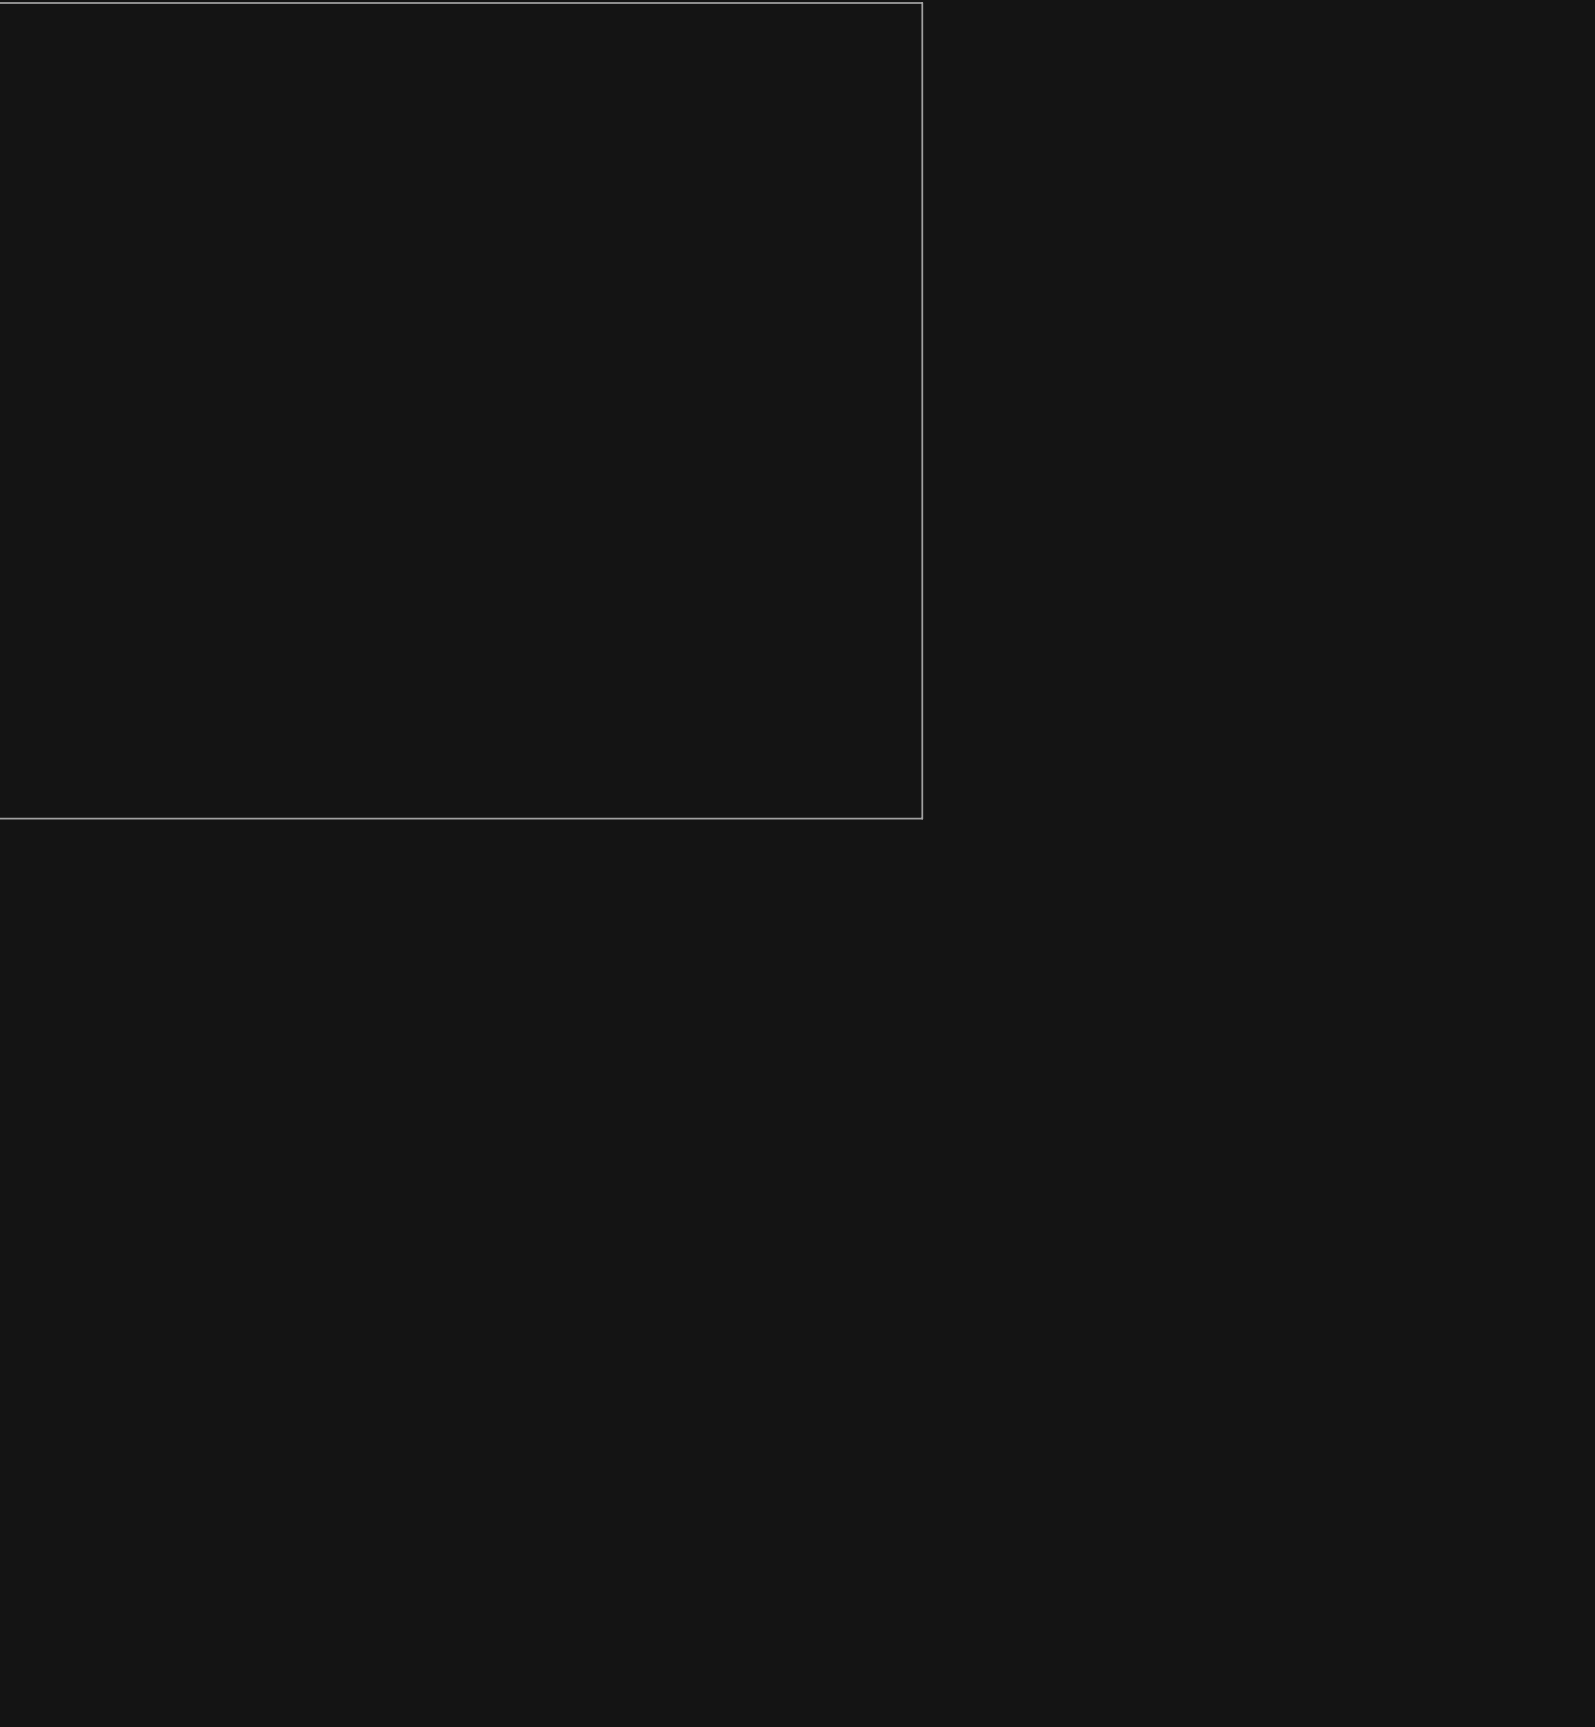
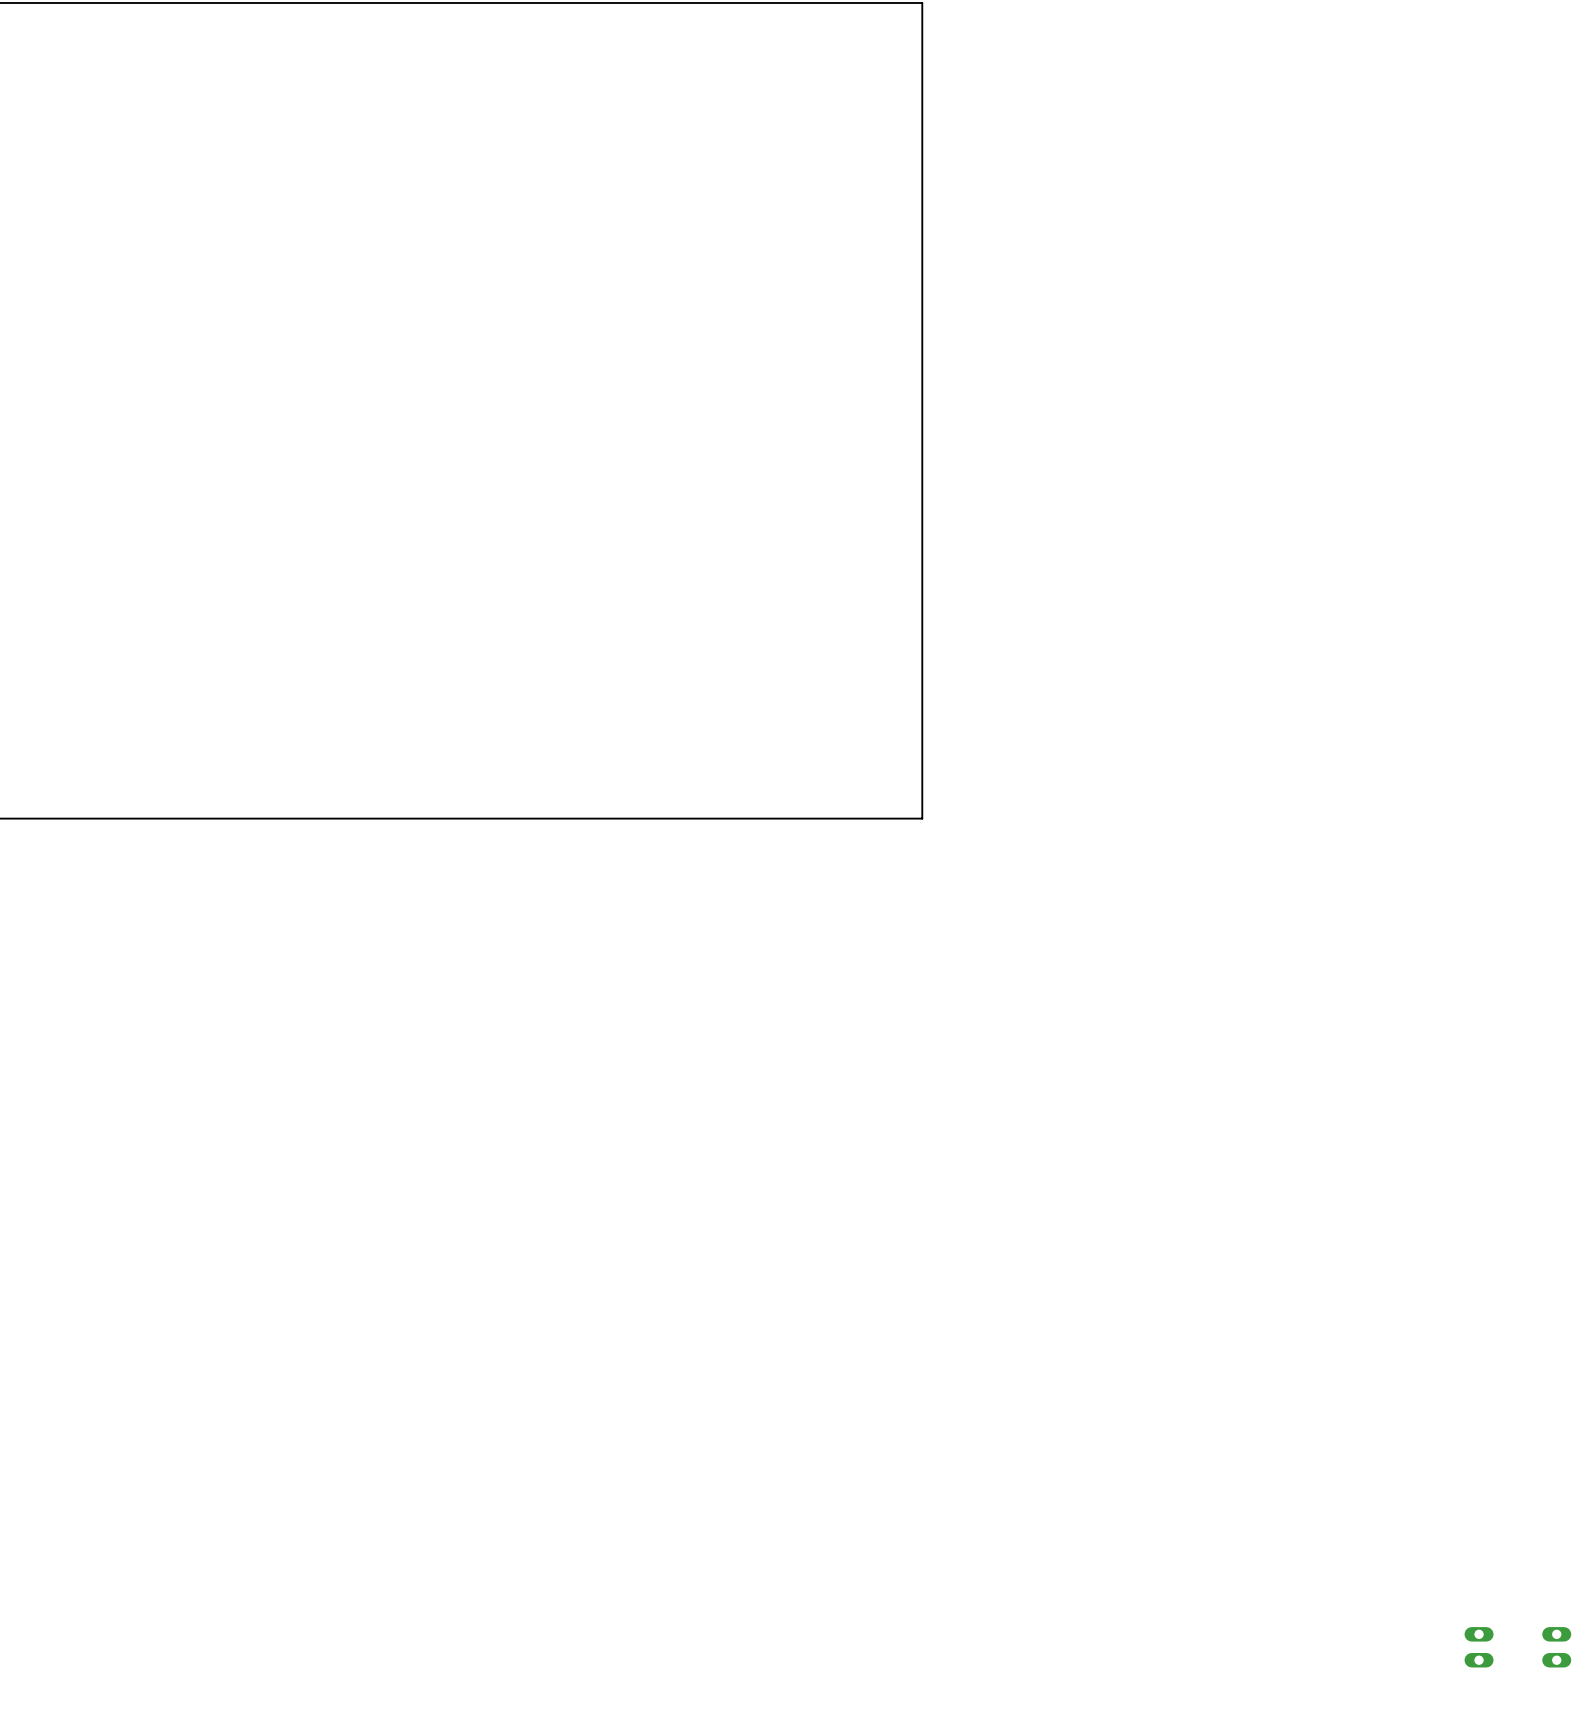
part: none -> (1479, 1647)
part: none -> (1556, 1647)

